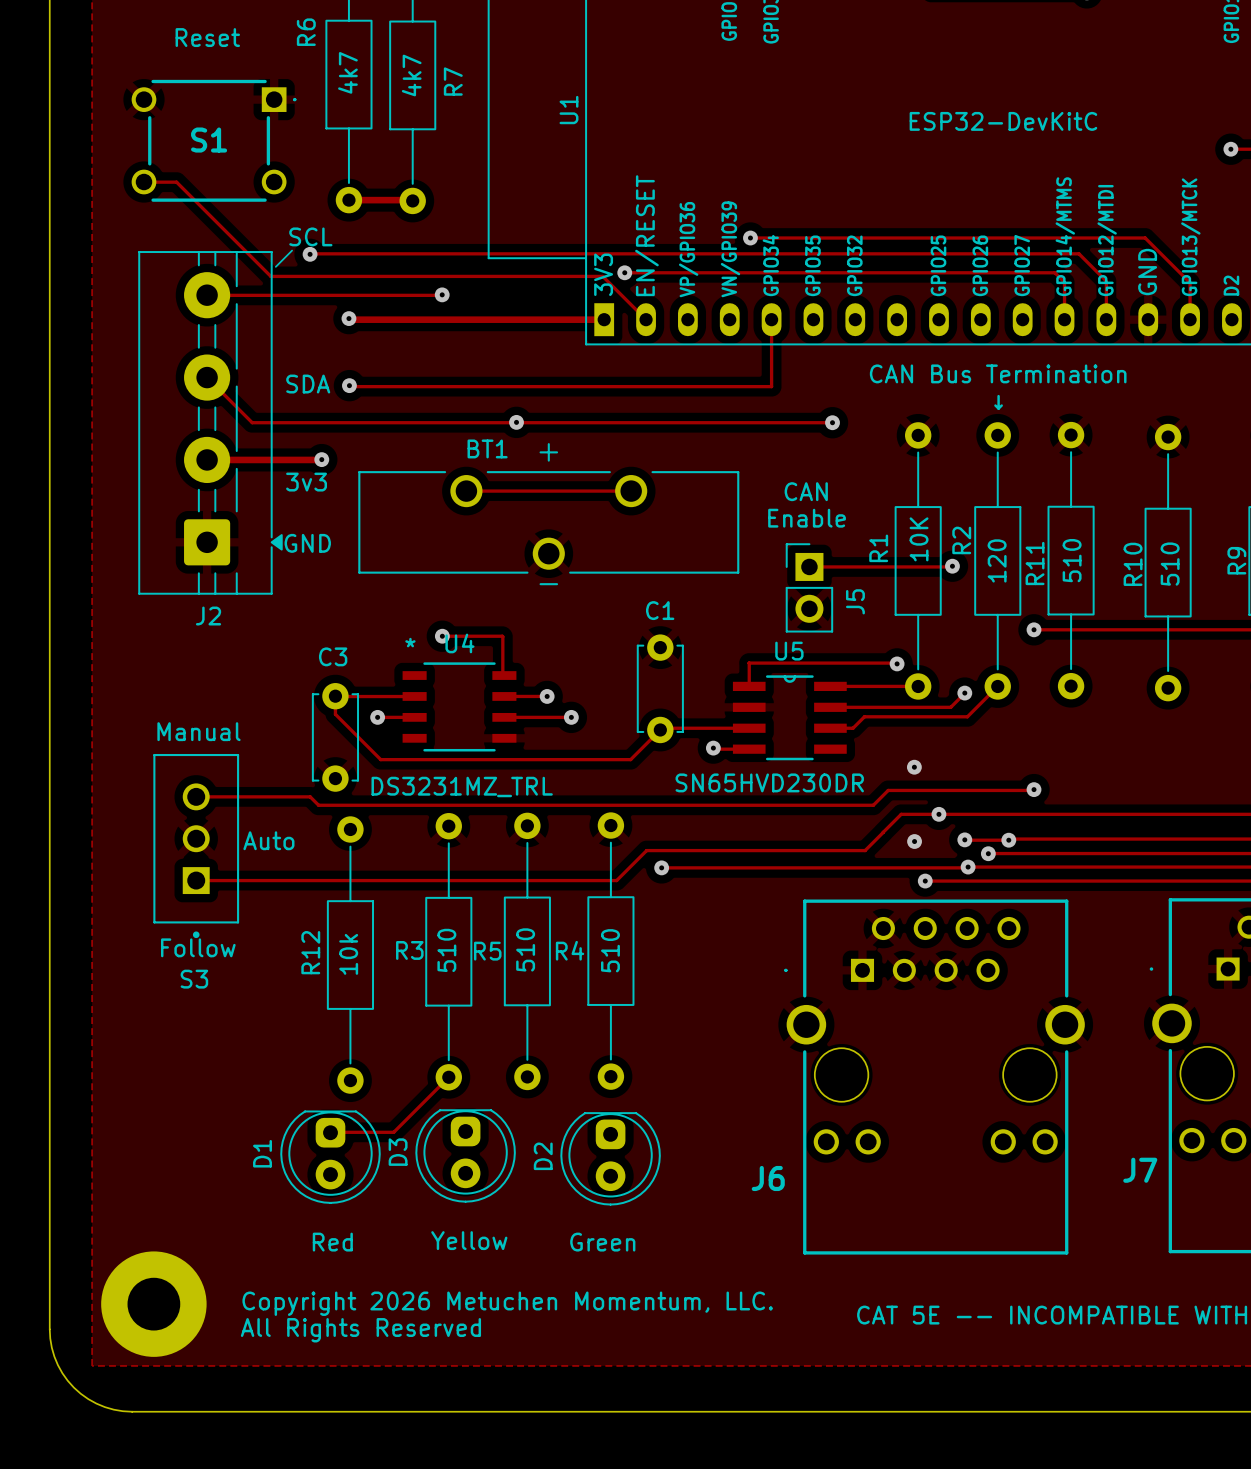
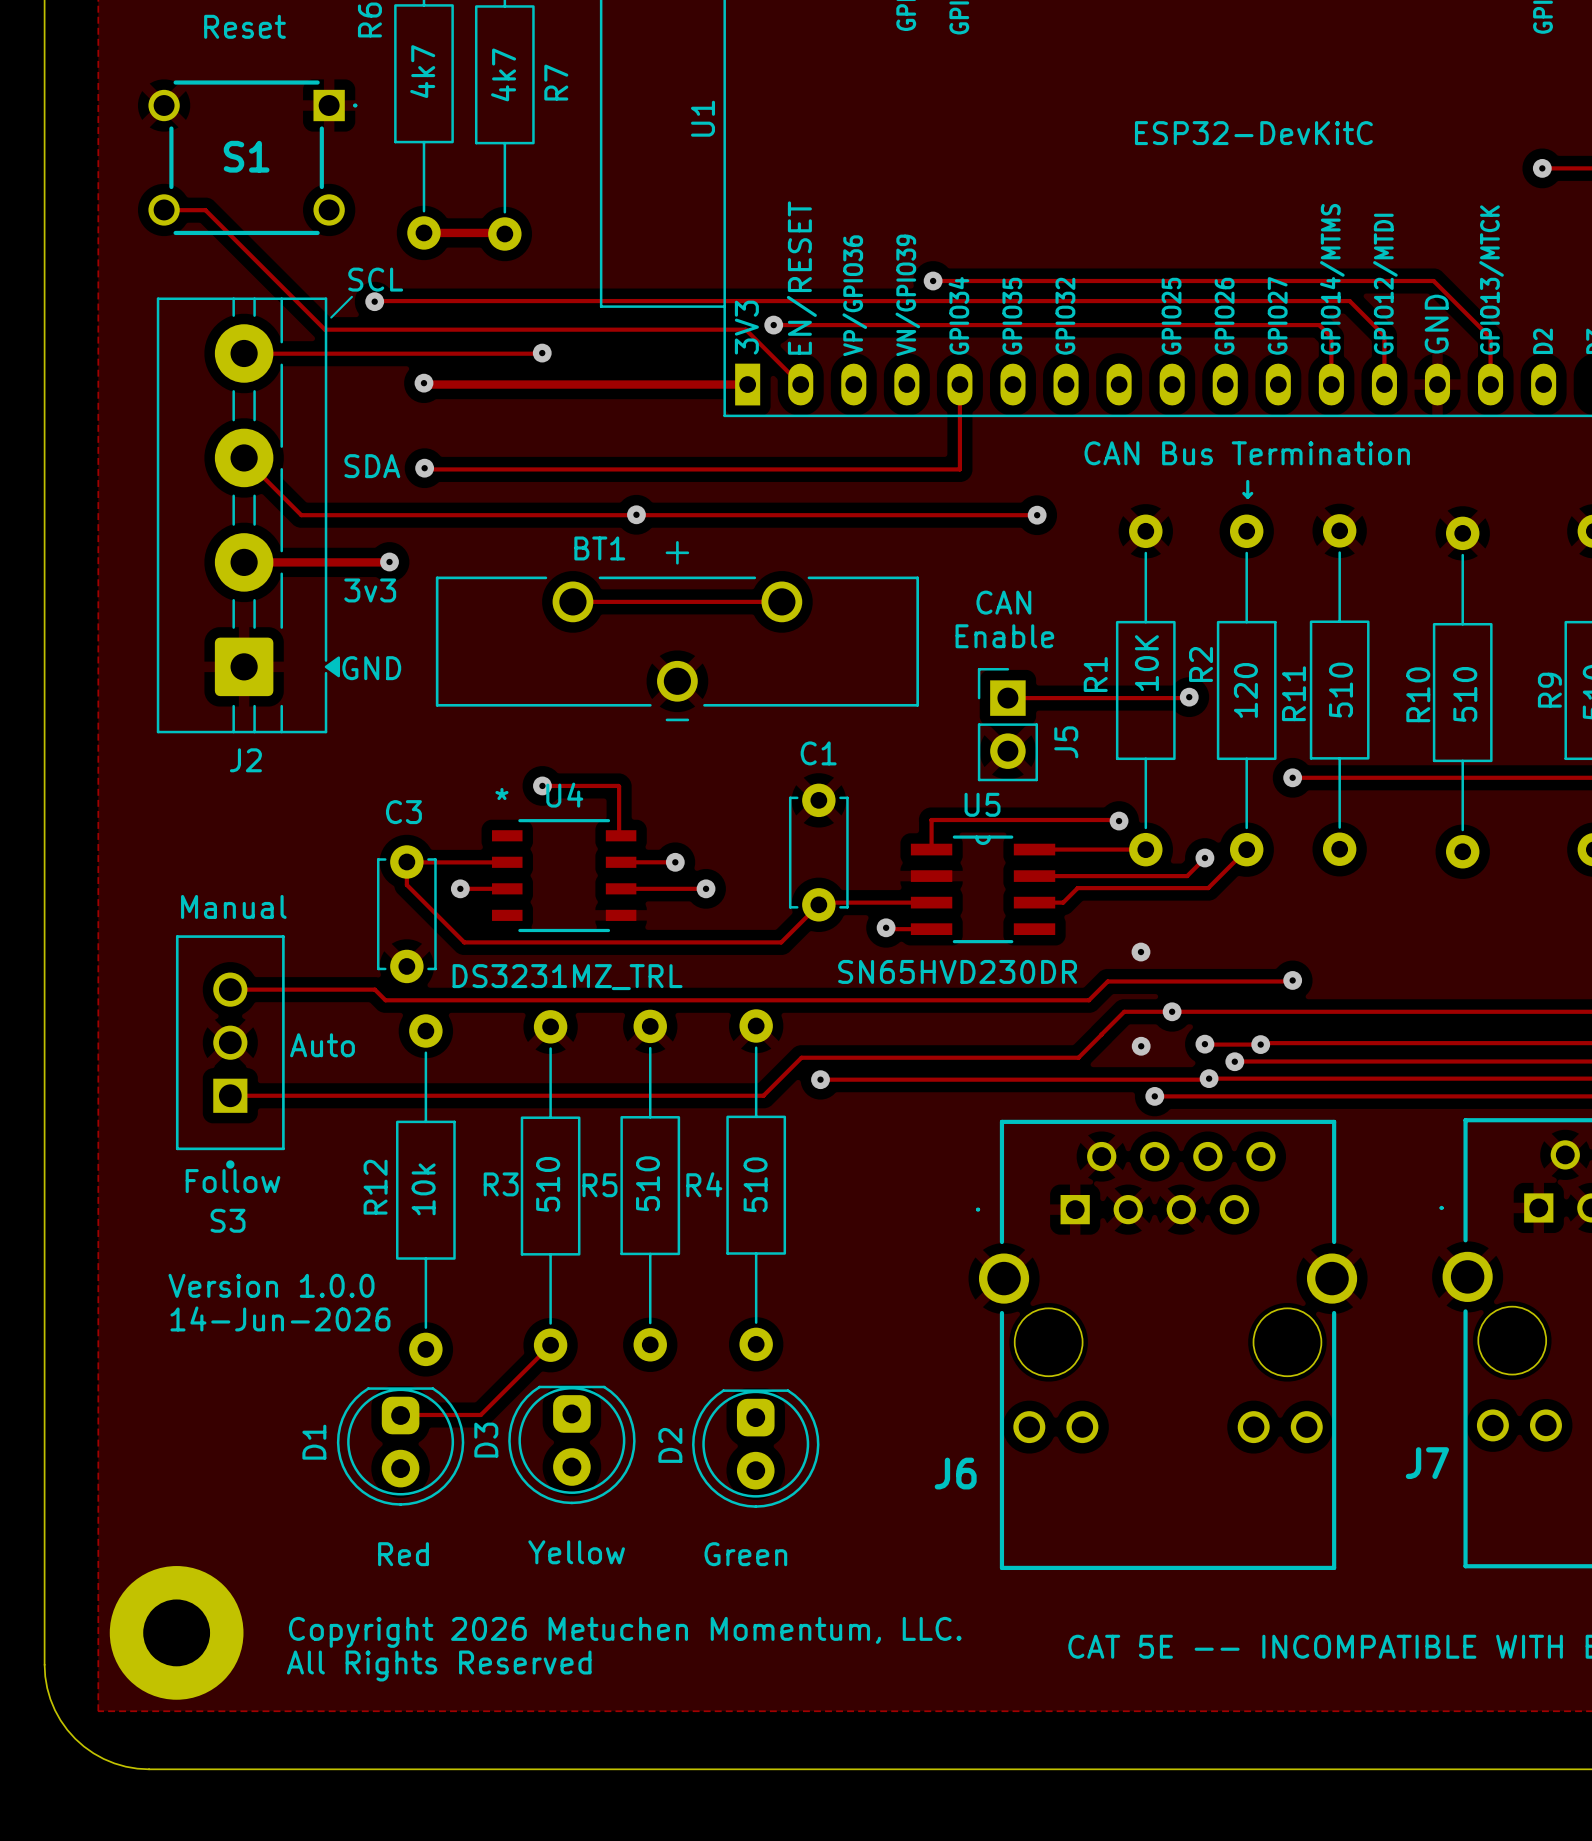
text: none -> Version 1.0.0 (271, 1285)
text: none -> 14-Jun-2026 (280, 1318)

